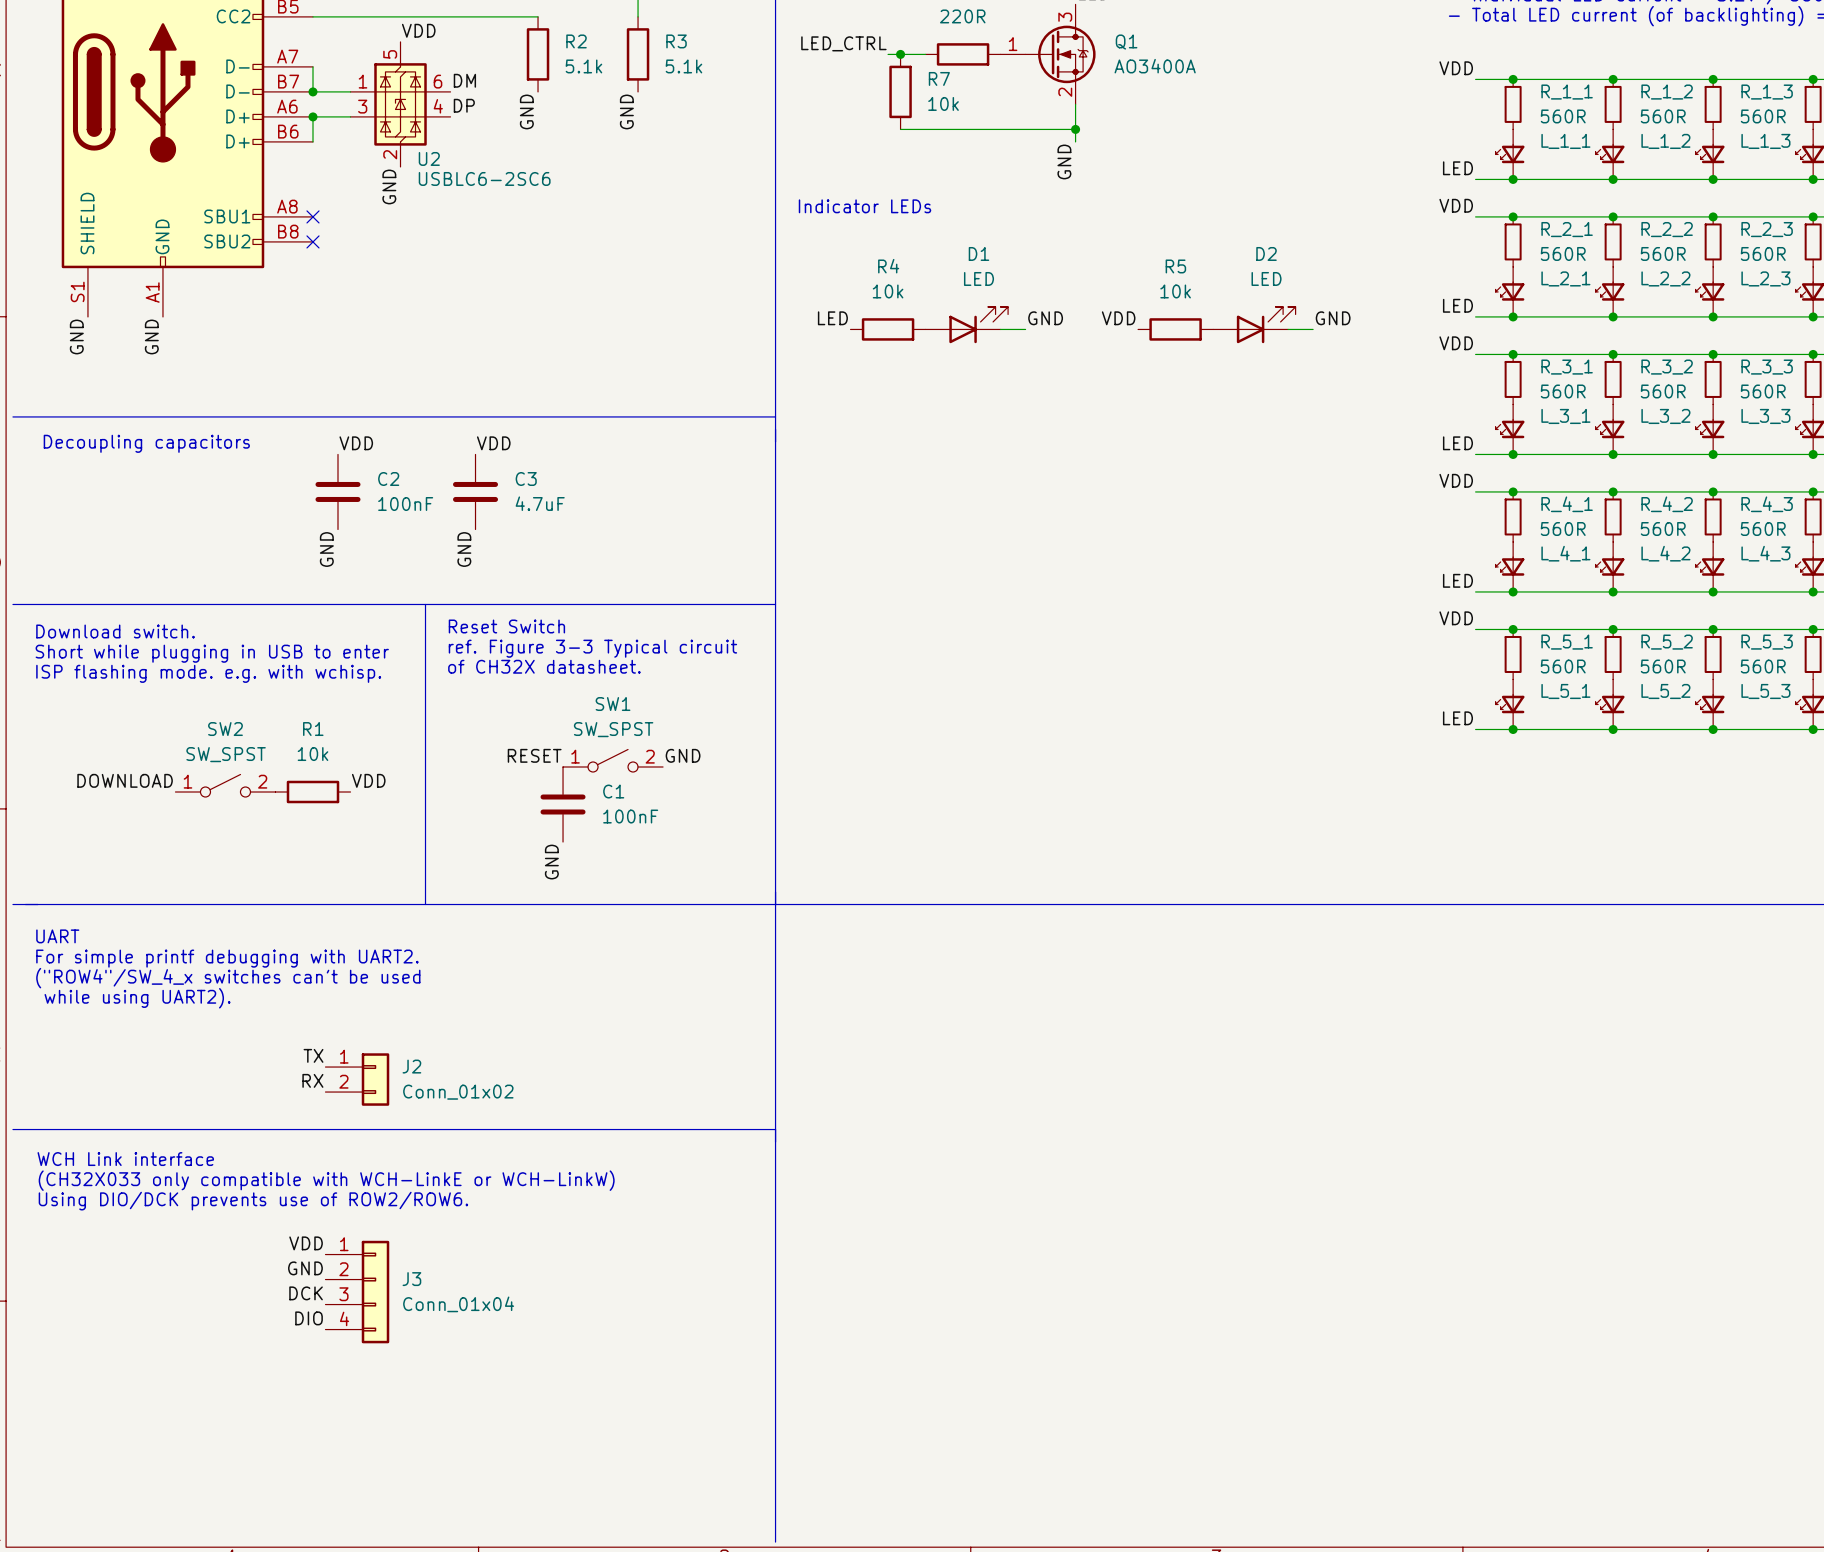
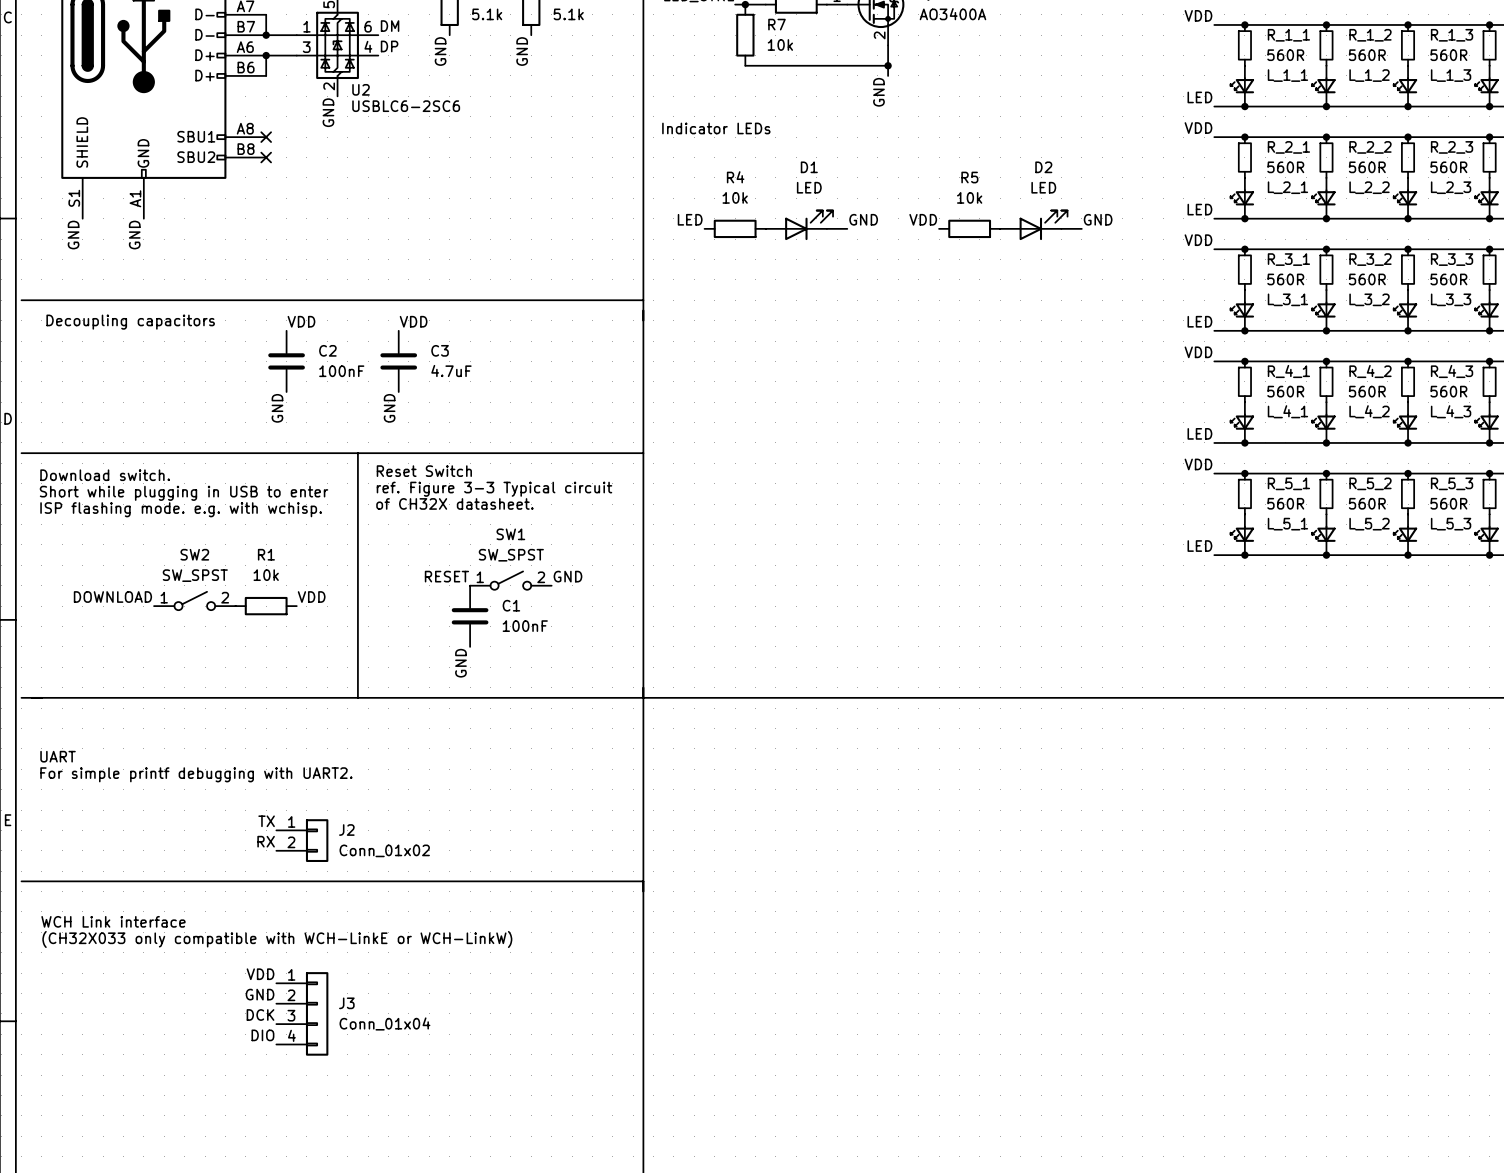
text: UART (57, 936) -> none
text: For simple printf debugging with UART2. (227, 958) -> none
text: ("ROW4"/SW_4_x switches can't be used (228, 978) -> UART (58, 756)
text: while using UART2). (137, 998) -> For simple printf debugging with UART2. (196, 774)
text: WCH Link interface (125, 1159) -> none
text: (CH32X033 only compatible with WCH-LinkE or WCH-LinkW) (326, 1180) -> WCH Link interface (113, 921)
text: Using DIO/DCK prevents use of ROW2/ROW6. (253, 1201) -> (CH32X033 only compatible with WCH-LinkE or WCH-LinkW) (277, 939)

